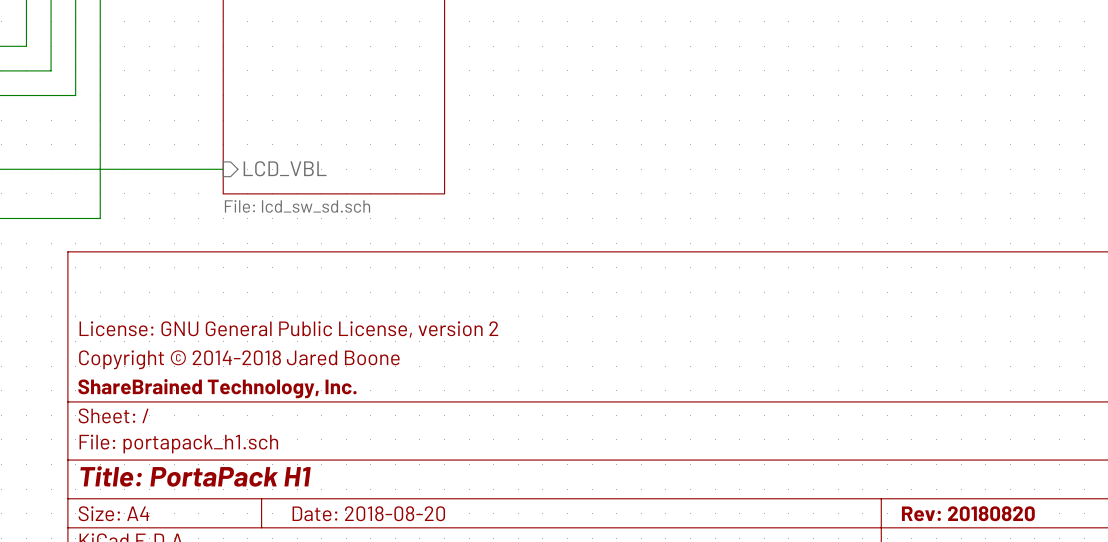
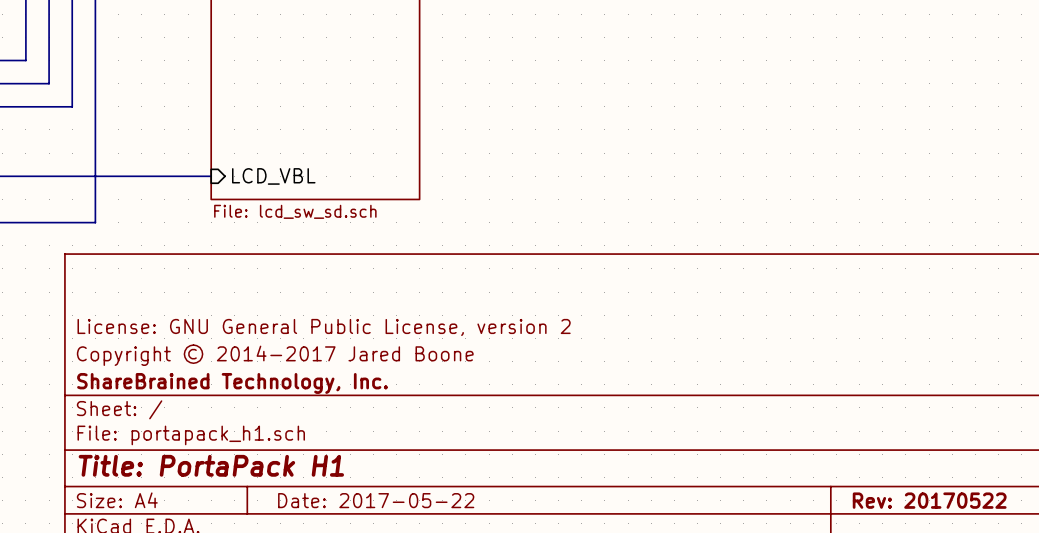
title block: Copyright © 2014-2018 Jared Boone (239, 359) -> Copyright © 2014-2017 Jared Boone (275, 355)
title block: Date: 2018-08-20 (368, 513) -> Date: 2017-05-22 (376, 500)
title block: Rev: 20180820 (968, 513) -> Rev: 20170522 (929, 500)

